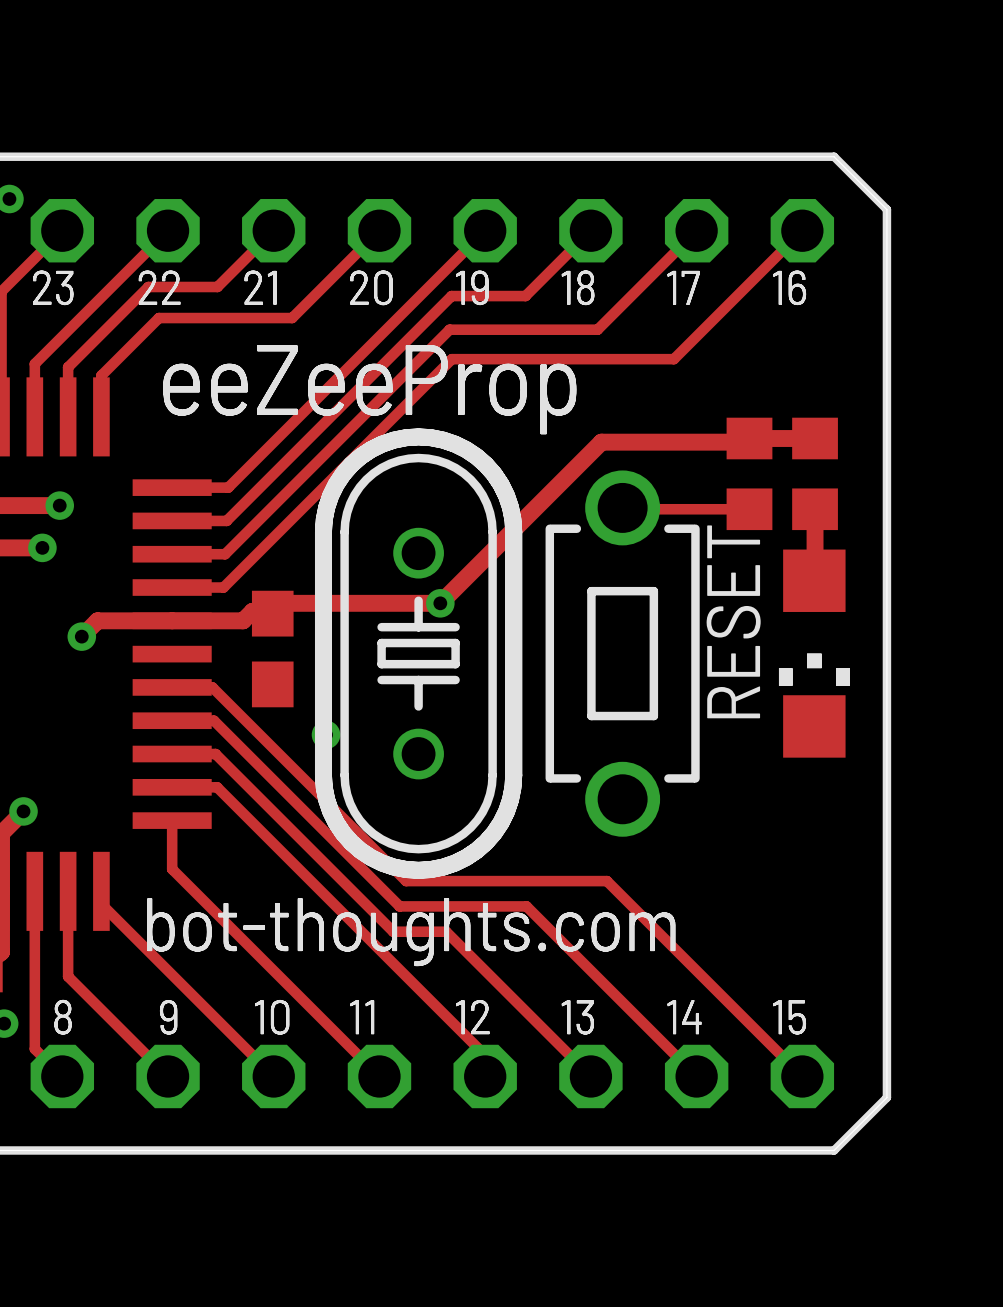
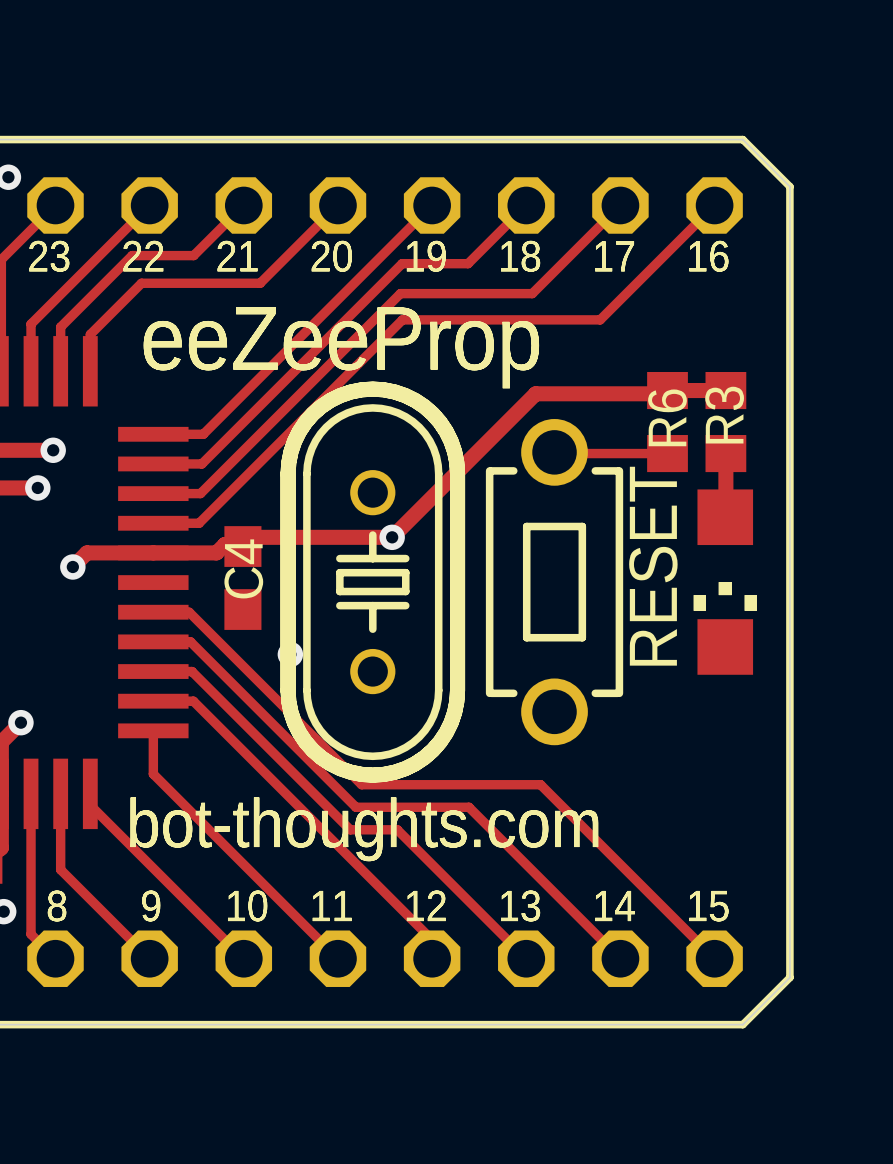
R3 name: none -> R3 (724, 415)
R6 name: none -> R6 (667, 417)
C4 name: none -> C4 (243, 568)

